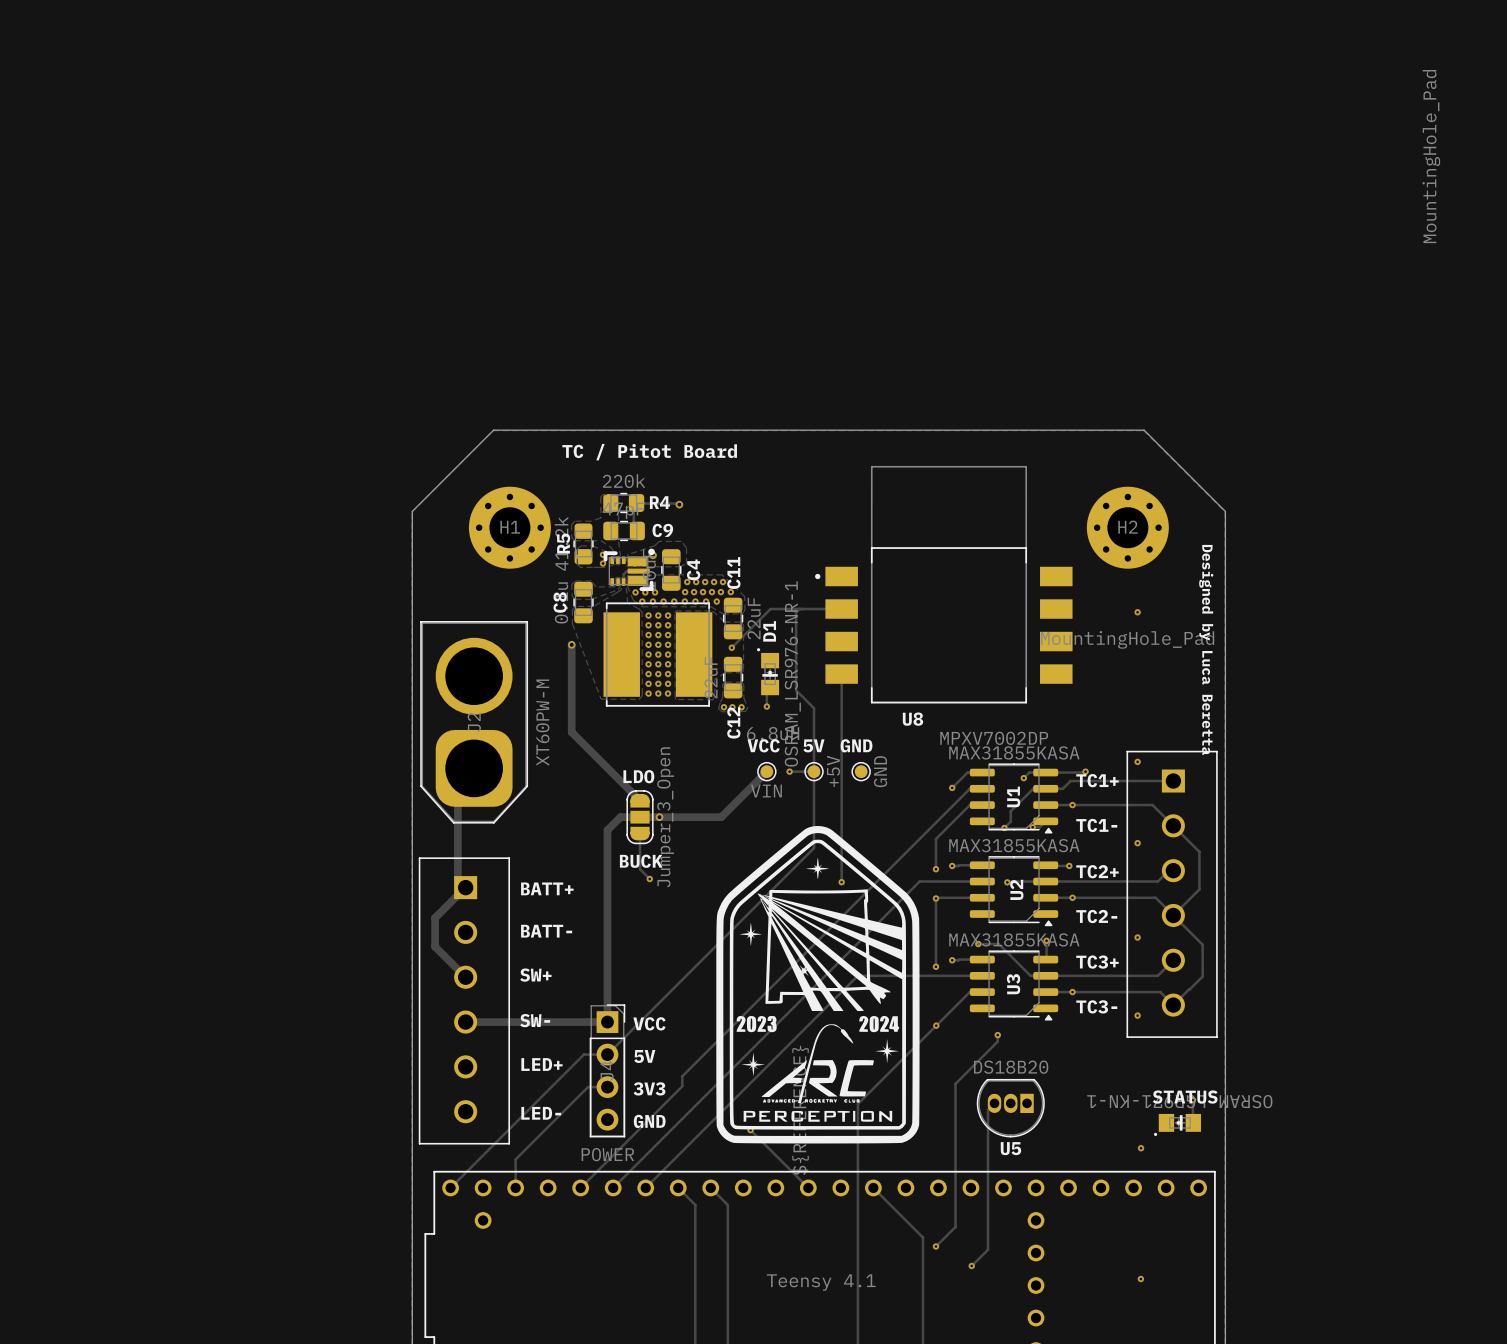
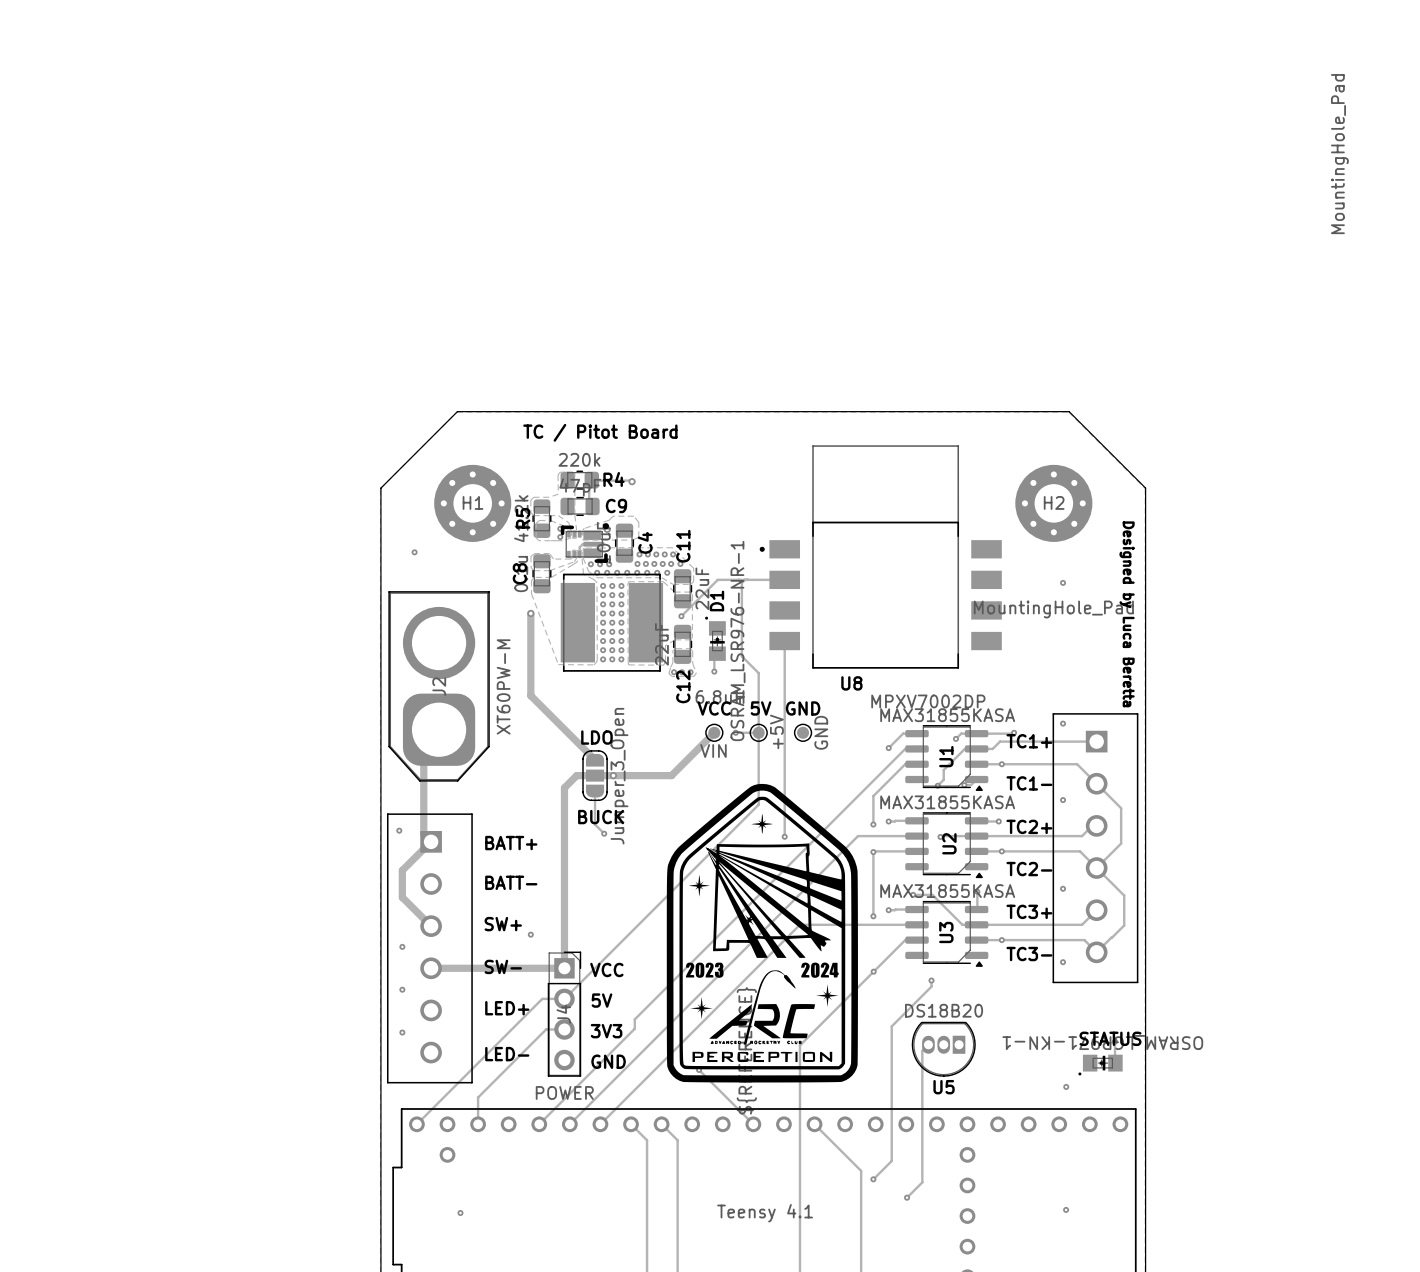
via: none -> (414, 552)
via: none -> (399, 830)
via: none -> (530, 934)
via: none -> (402, 946)
via: none -> (402, 989)
via: none -> (402, 1032)
via: none -> (460, 1212)

